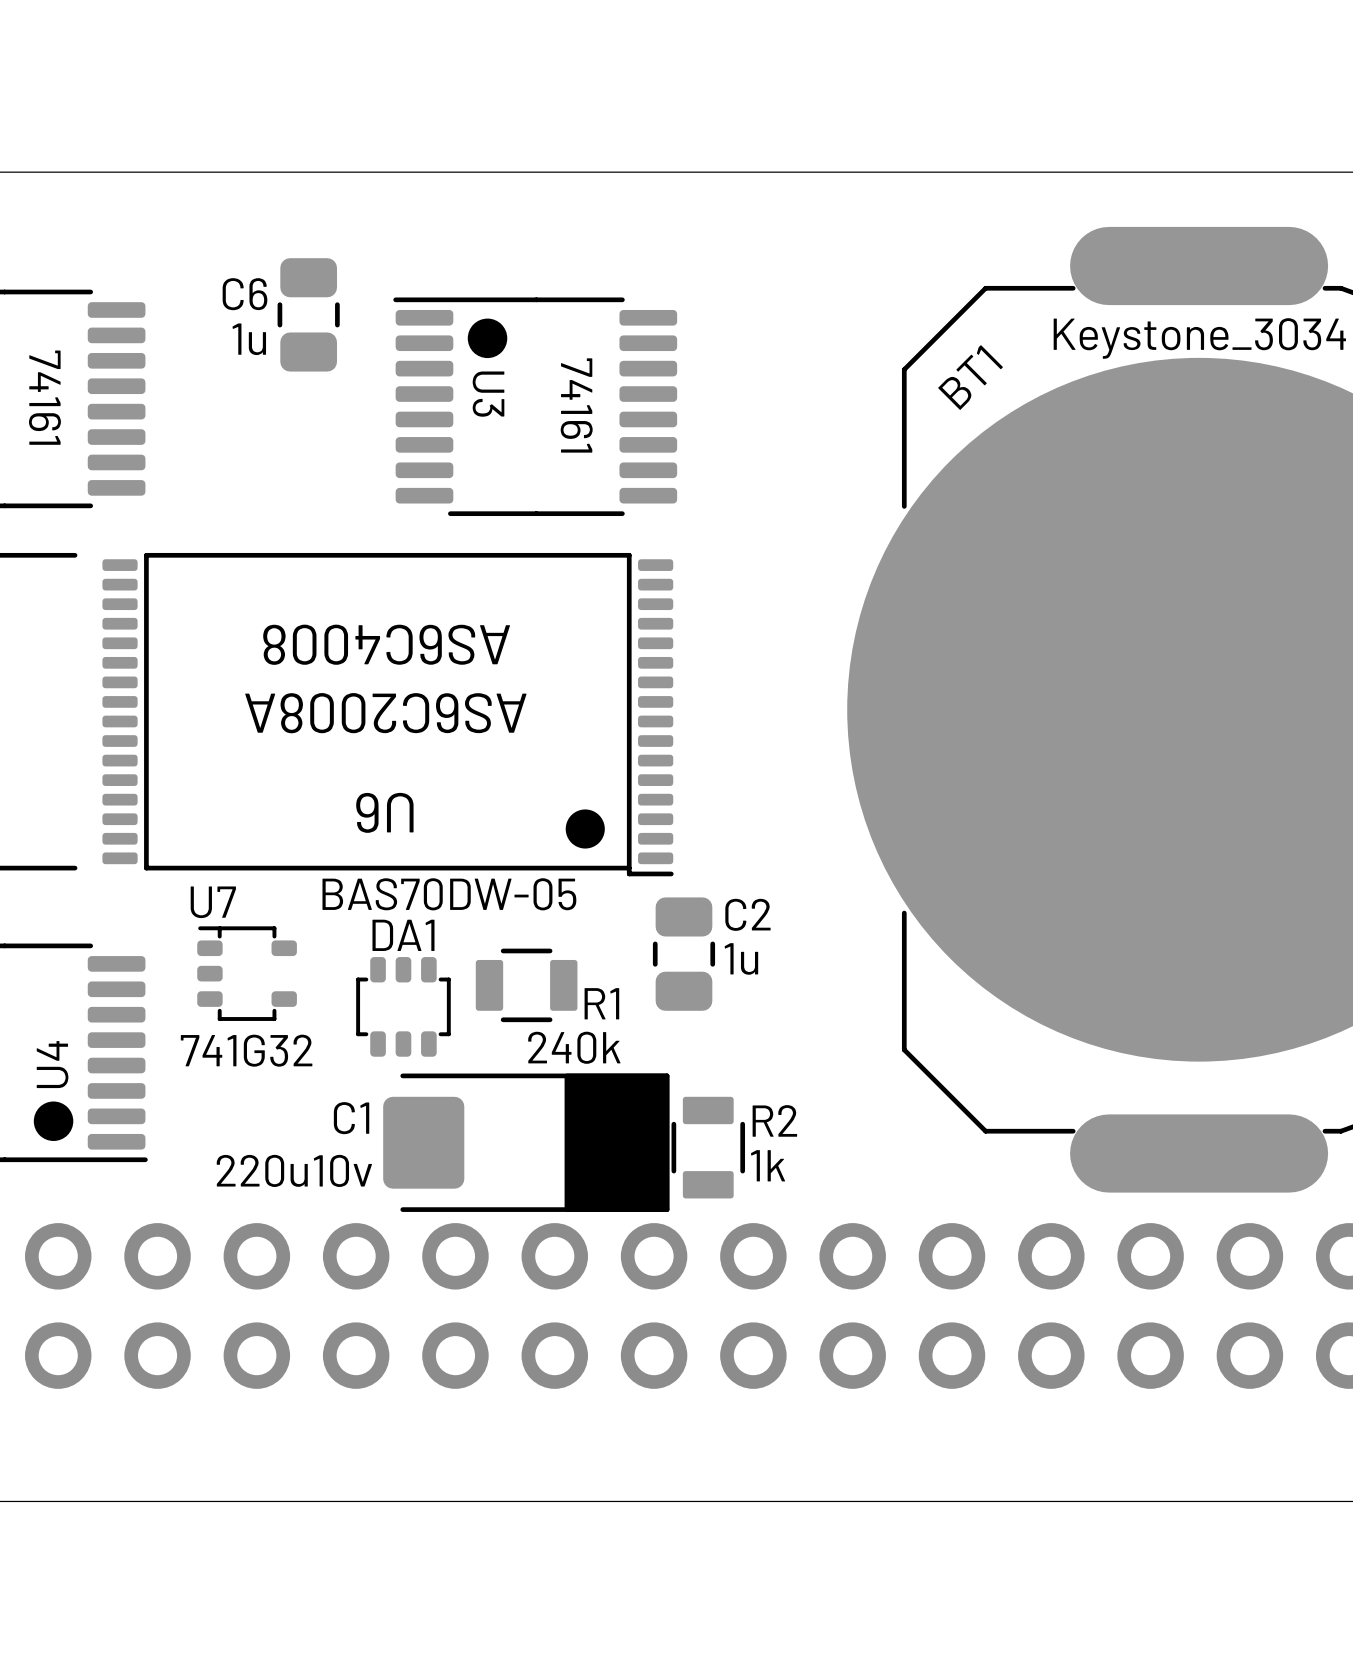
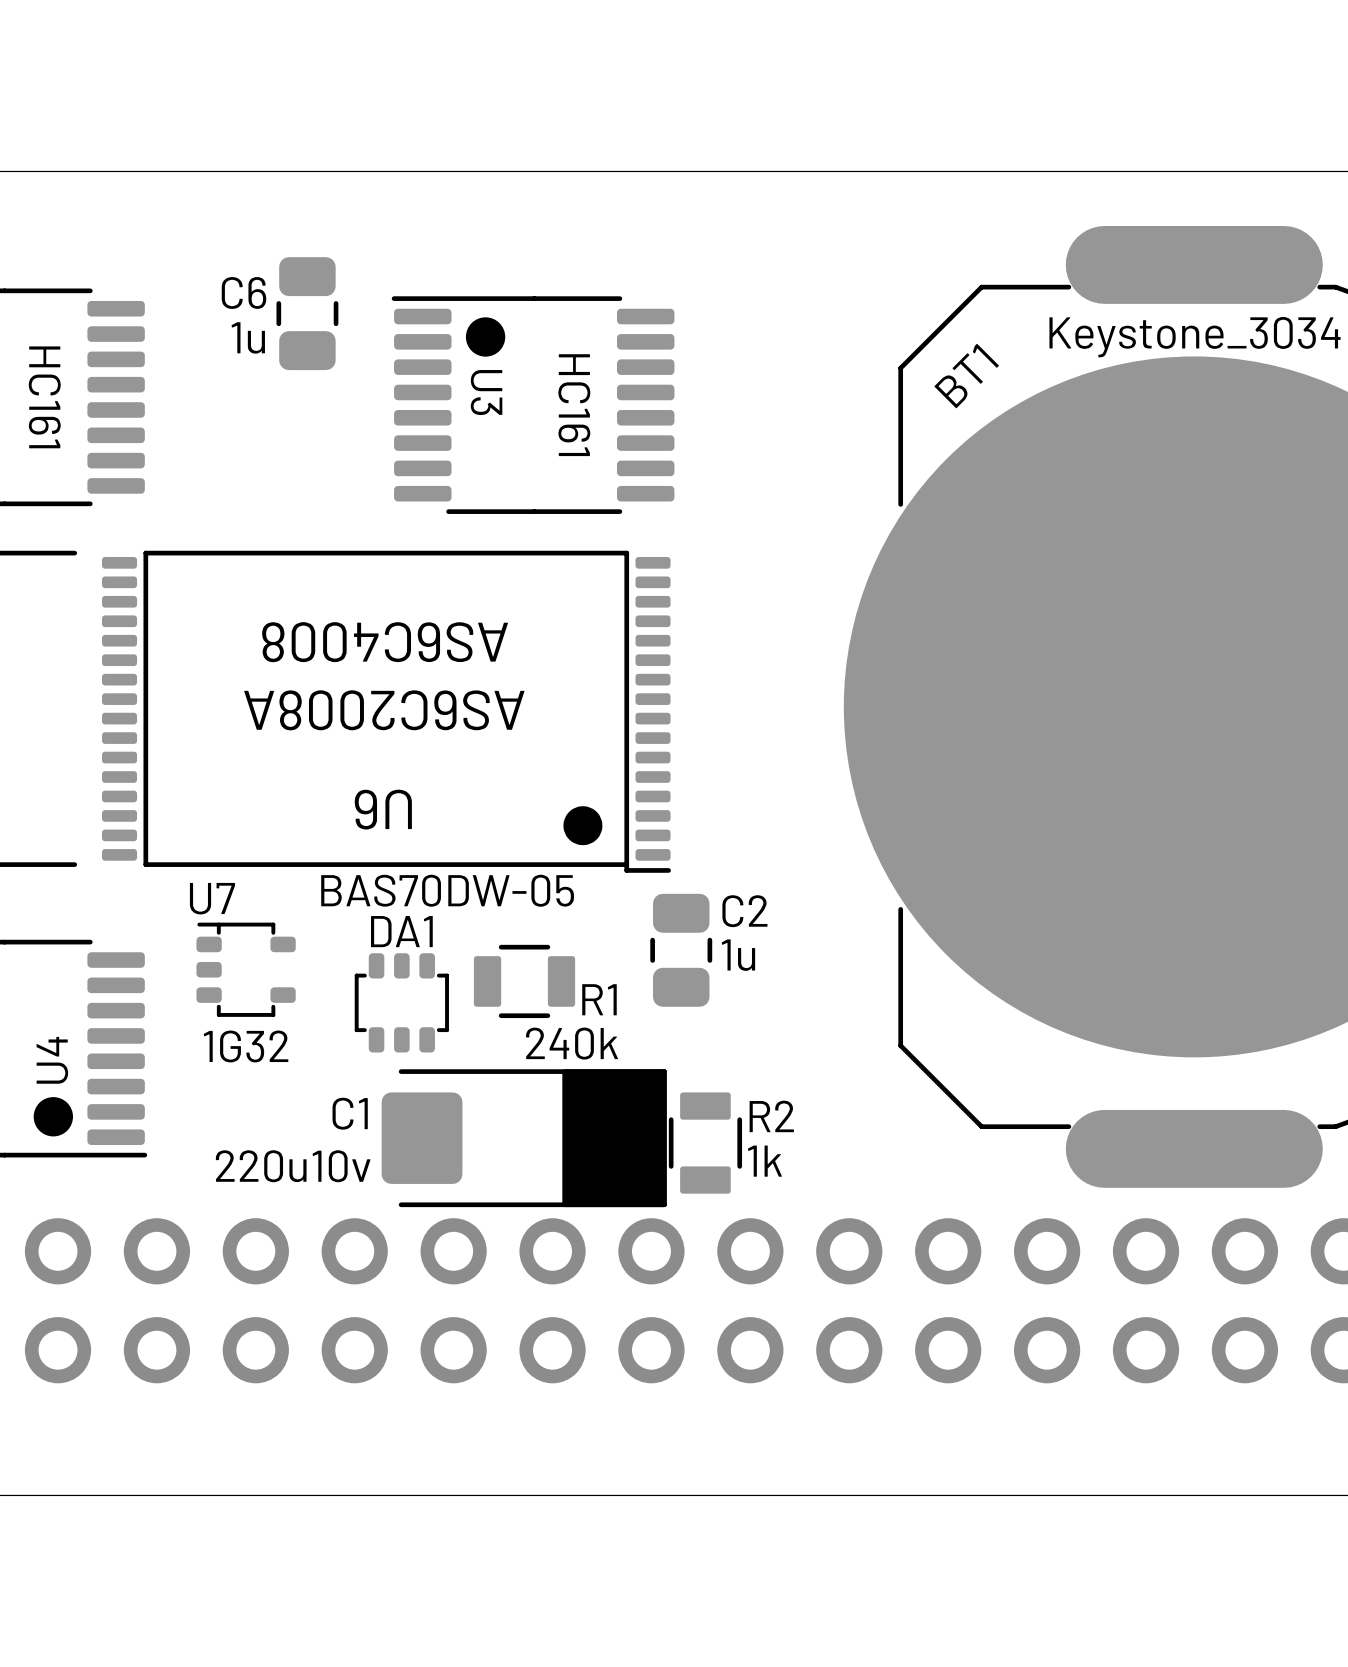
part value: 74161 (44, 397) -> HC161 (44, 397)
U3 value: 74161 (576, 405) -> HC161 (574, 405)
U7 value: 741G32 (246, 1050) -> 1G32 (246, 1046)

